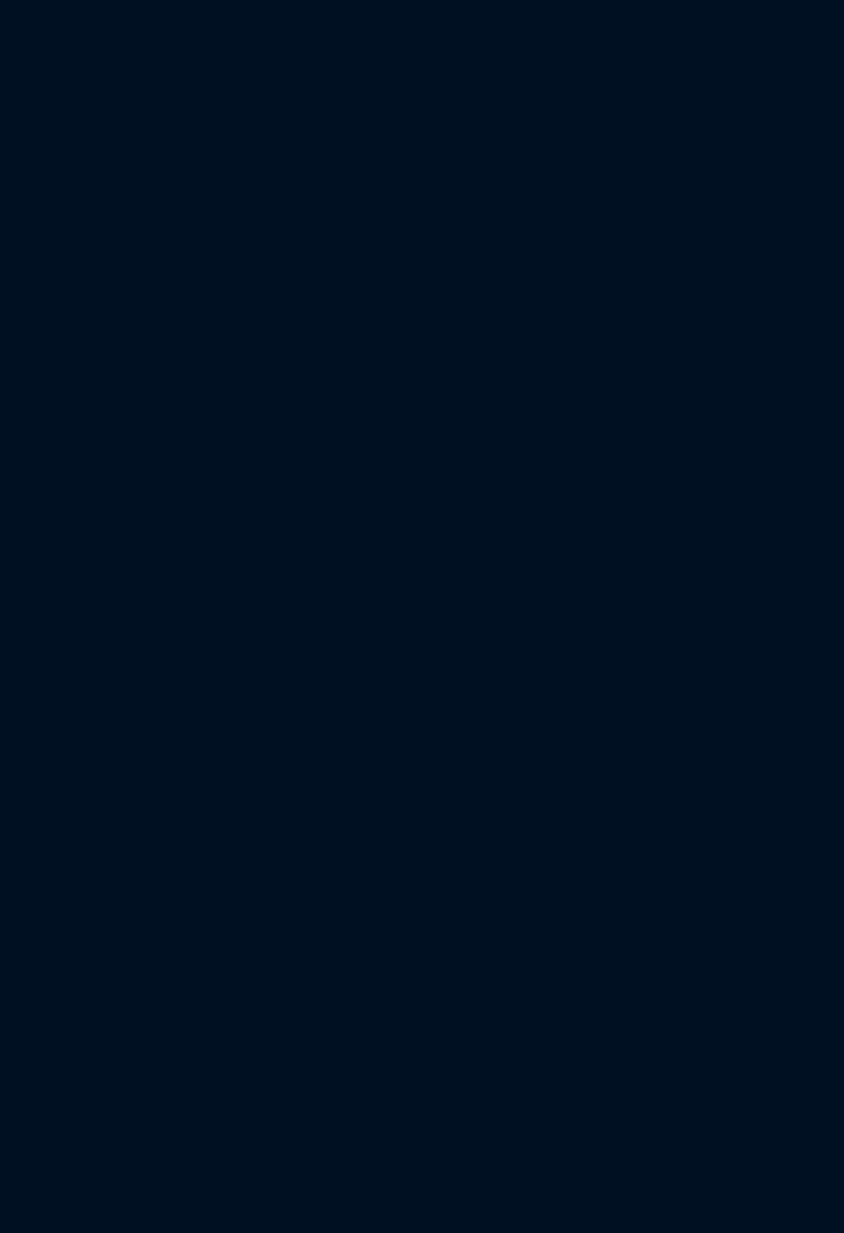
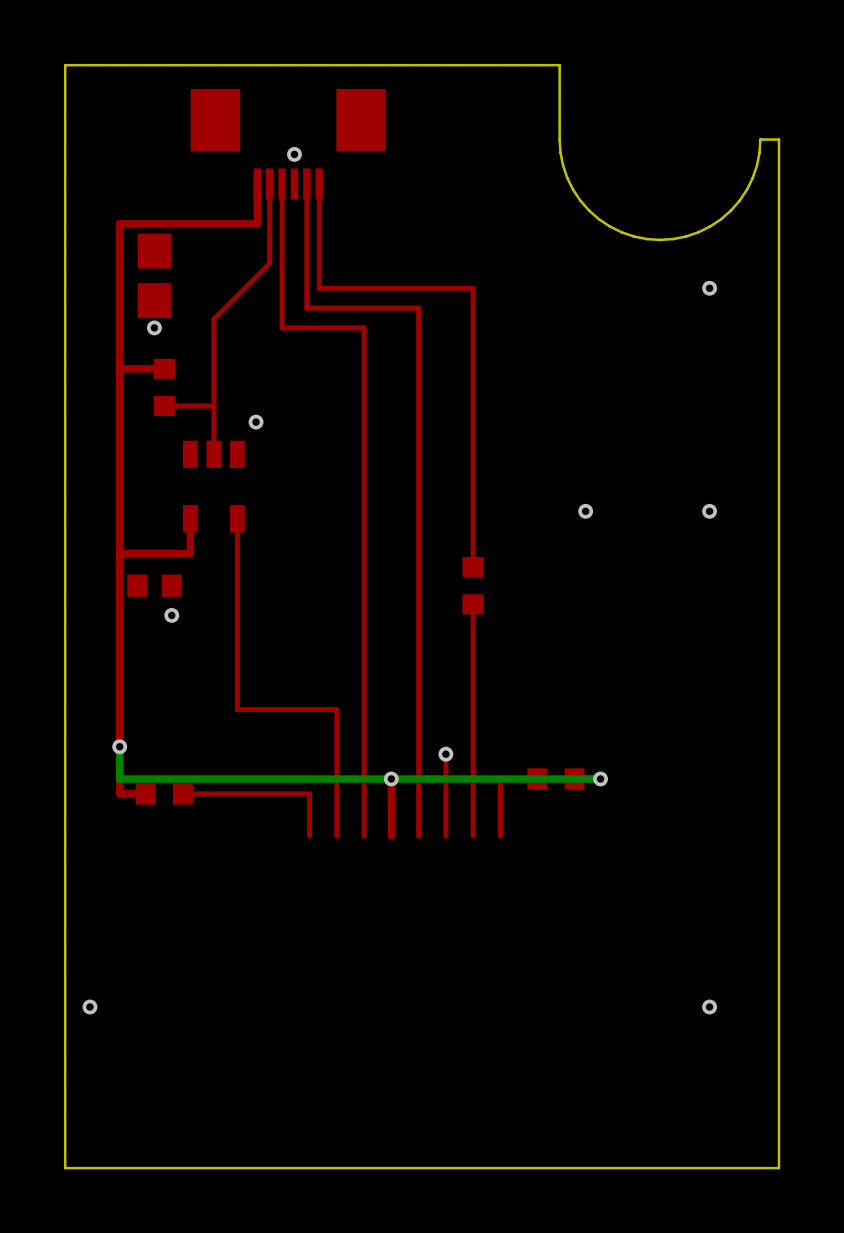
board edge: none -> (559, 65) (560, 152) (567, 177) (580, 200) (598, 219) (621, 232) (634, 236) (660, 239) (673, 239) (698, 232) (721, 219) (739, 200) (752, 177) (759, 152) (760, 139) (778, 139) (778, 1168) (65, 1168) (65, 65) (559, 65)
part: none -> (288, 144)
via: none -> (294, 154)
top track: none -> (257, 183) (257, 223) (119, 223) (119, 793) (145, 793)
top track: none -> (269, 183) (269, 263) (213, 319) (213, 454)
top track: none -> (282, 183) (282, 327) (364, 327) (364, 835)
top track: none -> (306, 183) (306, 308) (418, 308) (418, 835)
top track: none -> (319, 183) (319, 288) (473, 288) (473, 567)
part: none -> (154, 275)
via: none -> (709, 288)
via: none -> (154, 327)
top track: none -> (164, 368) (119, 368)
part: none -> (164, 387)
top track: none -> (213, 405) (164, 405)
via: none -> (256, 422)
part: none -> (213, 486)
via: none -> (585, 511)
via: none -> (709, 511)
top track: none -> (190, 518) (190, 553) (119, 553)
top track: none -> (237, 518) (237, 709) (336, 709) (336, 835)
part: none -> (154, 585)
part: none -> (473, 585)
top track: none -> (473, 604) (473, 835)
via: none -> (171, 615)
bottom track: none -> (119, 746) (119, 778) (600, 778)
via: none -> (119, 746)
top track: none -> (445, 754) (445, 835)
via: none -> (445, 754)
top track: none -> (391, 778) (391, 835)
via: none -> (391, 778)
top track: none -> (537, 778) (500, 778) (500, 835)
part: none -> (555, 778)
via: none -> (600, 778)
part: none -> (164, 793)
top track: none -> (182, 793) (309, 793) (309, 835)
via: none -> (89, 1007)
via: none -> (709, 1007)

